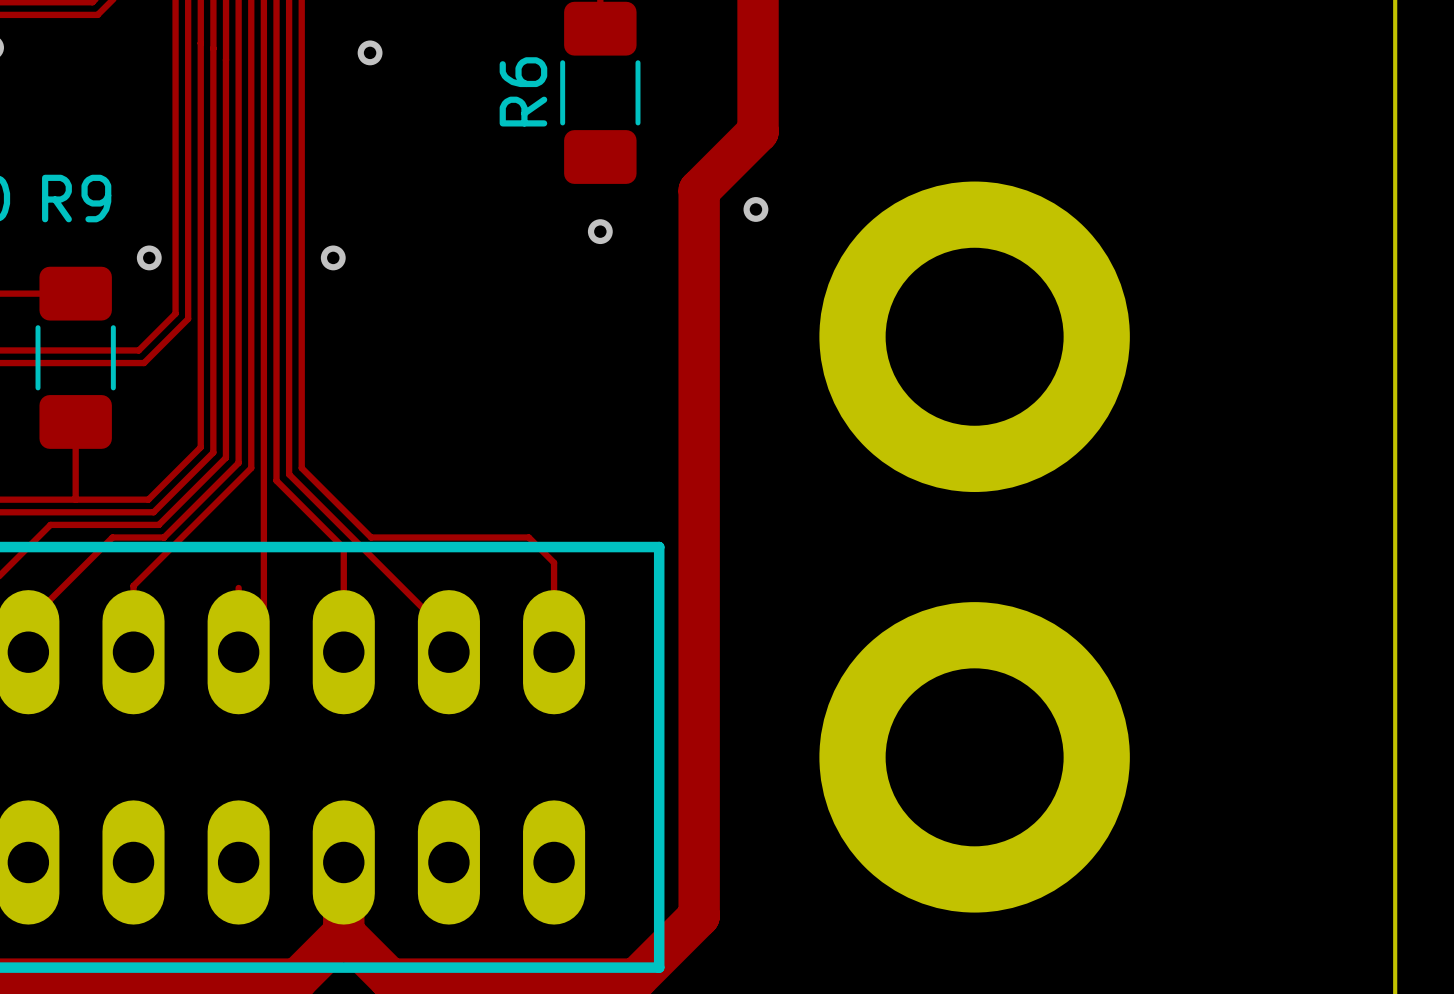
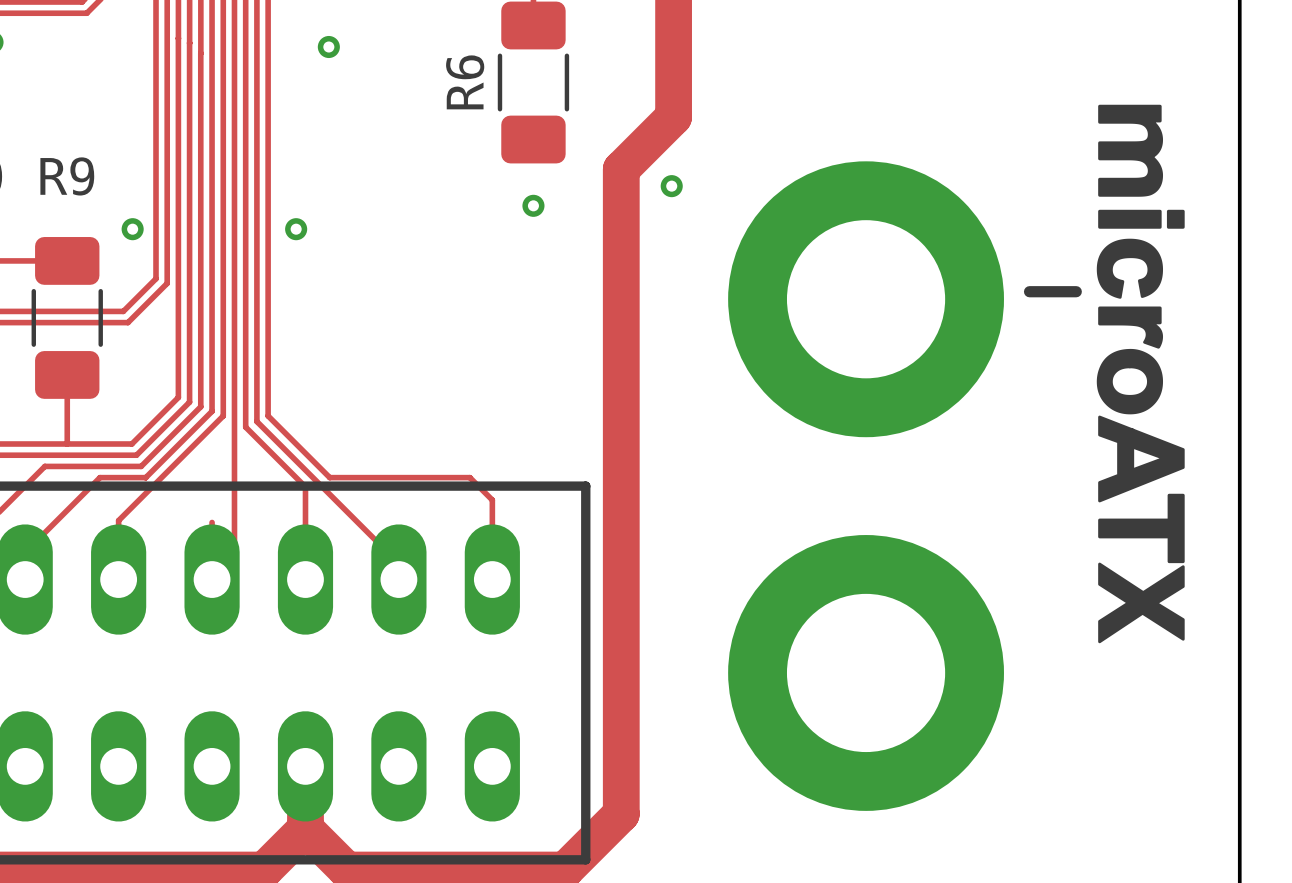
drawing: none -> [1096, 104, 1185, 644]
line: none -> (1029, 291) (1076, 291)

